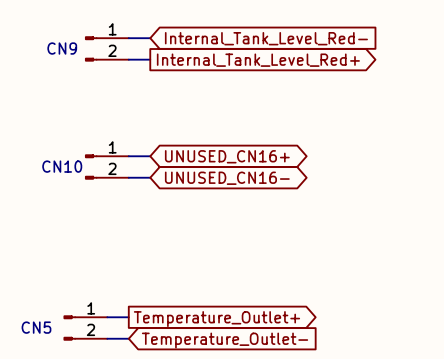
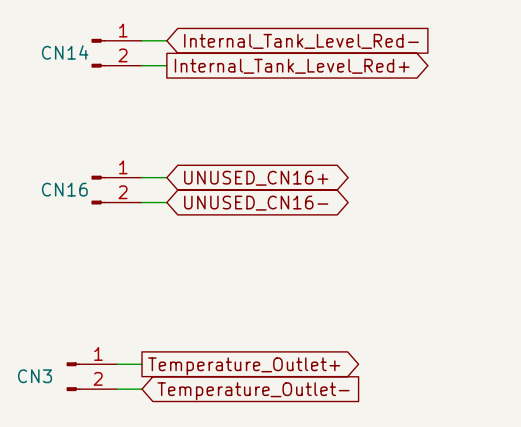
CN9 name: CN9 (62, 48) -> CN14 (65, 52)
CN10 name: CN10 (62, 166) -> CN16 (64, 189)
CN5 name: CN5 (36, 327) -> CN3 (34, 376)

